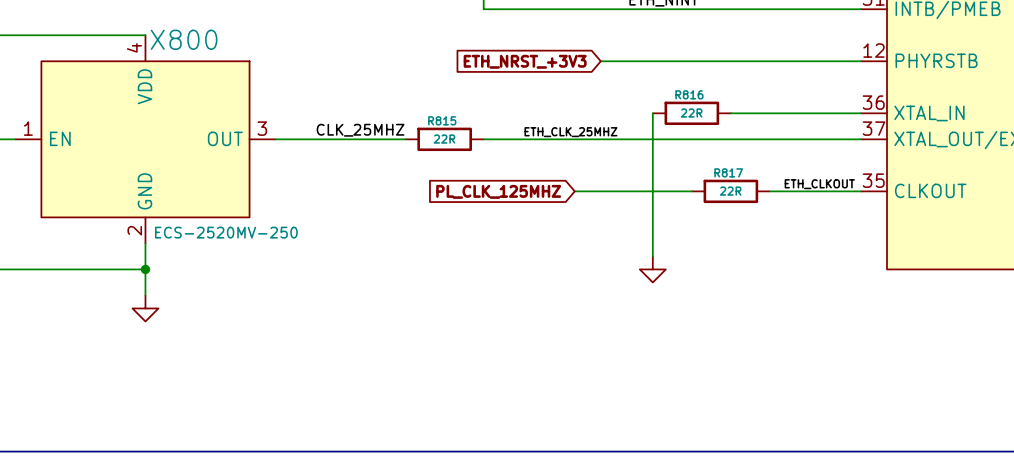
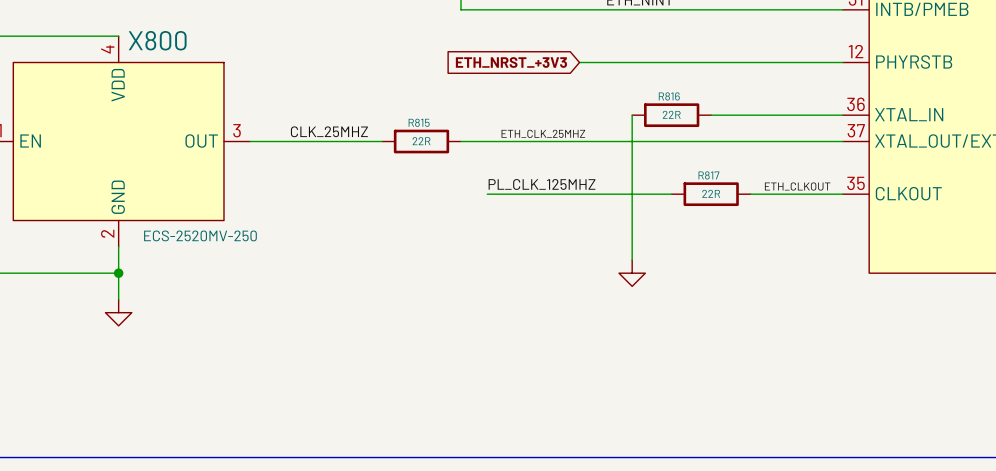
label: none -> PL_CLK_125MHZ (542, 184)
global label: PL_CLK_125MHZ (498, 191) -> none
wire: none -> (487, 194) (553, 194)

